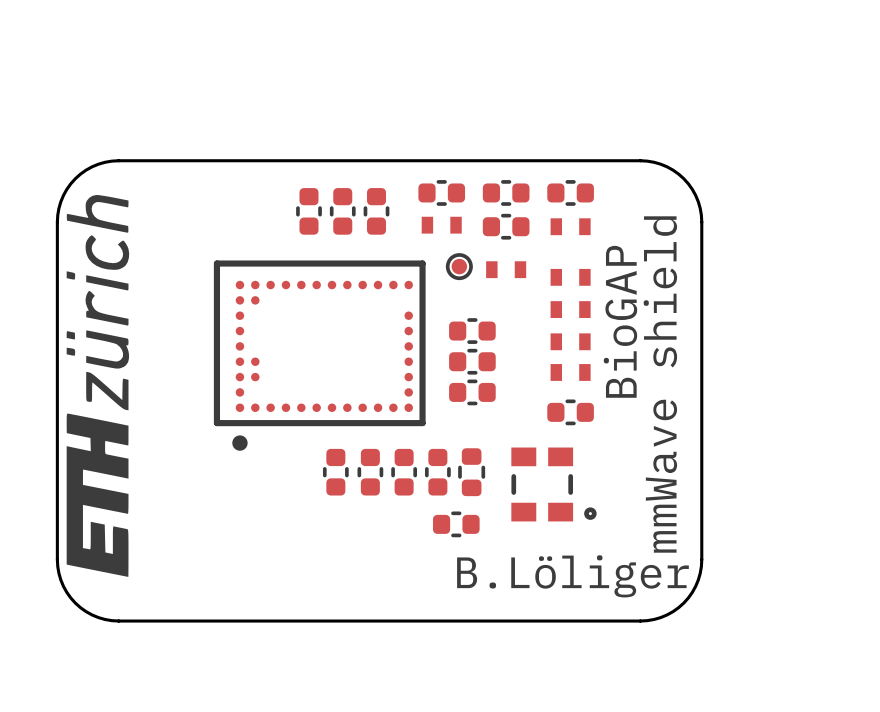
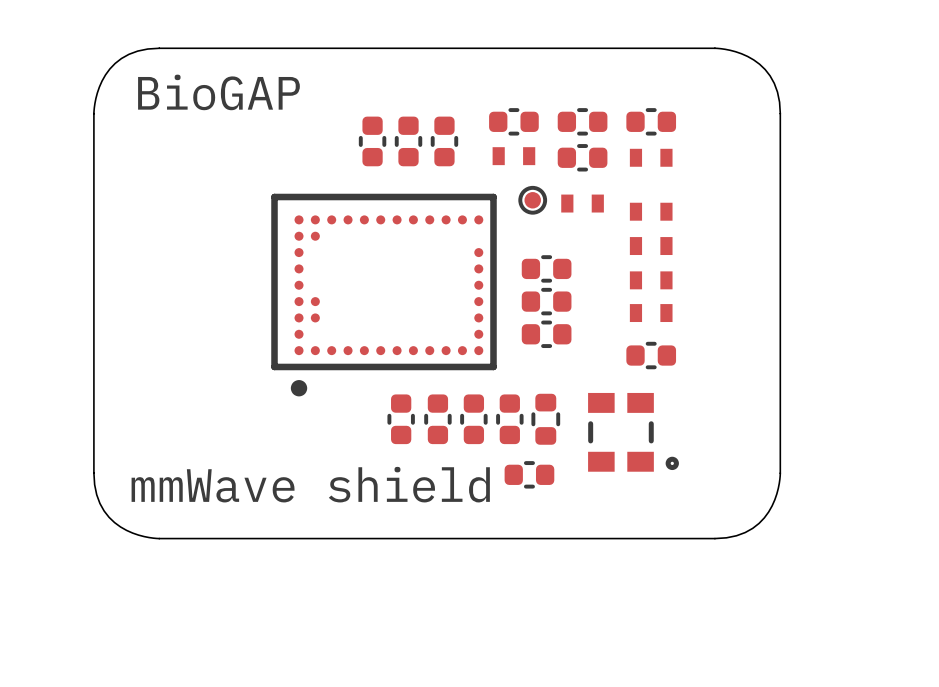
board edge: (118, 160) (640, 160) (660, 164) (678, 174) (688, 183) (695, 195) (700, 208) (701, 222) (701, 559) (698, 579) (688, 597) (678, 607) (667, 614) (654, 619) (640, 621) (118, 621) (98, 617) (80, 607) (70, 597) (63, 586) (57, 566) (57, 215) (63, 195) (75, 178) (86, 170) (98, 164) (118, 160) -> (159, 48) (137, 51) (115, 63) (102, 80) (94, 107) (93, 473) (94, 484) (99, 503) (114, 522) (132, 533) (158, 538) (714, 538) (726, 537) (745, 532) (764, 517) (774, 499) (780, 473) (780, 113) (779, 102) (774, 83) (759, 64) (741, 53) (715, 48) (159, 48)
drawing: [66, 194, 130, 577] -> none
text rotation: 0° (620, 321) -> 90° clockwise (218, 92)
text position: BioGAP (620, 321) -> BioGAP (218, 92)
text rotation: 0° (660, 384) -> 90° clockwise (310, 484)
text: B.Löliger (572, 576) -> none

